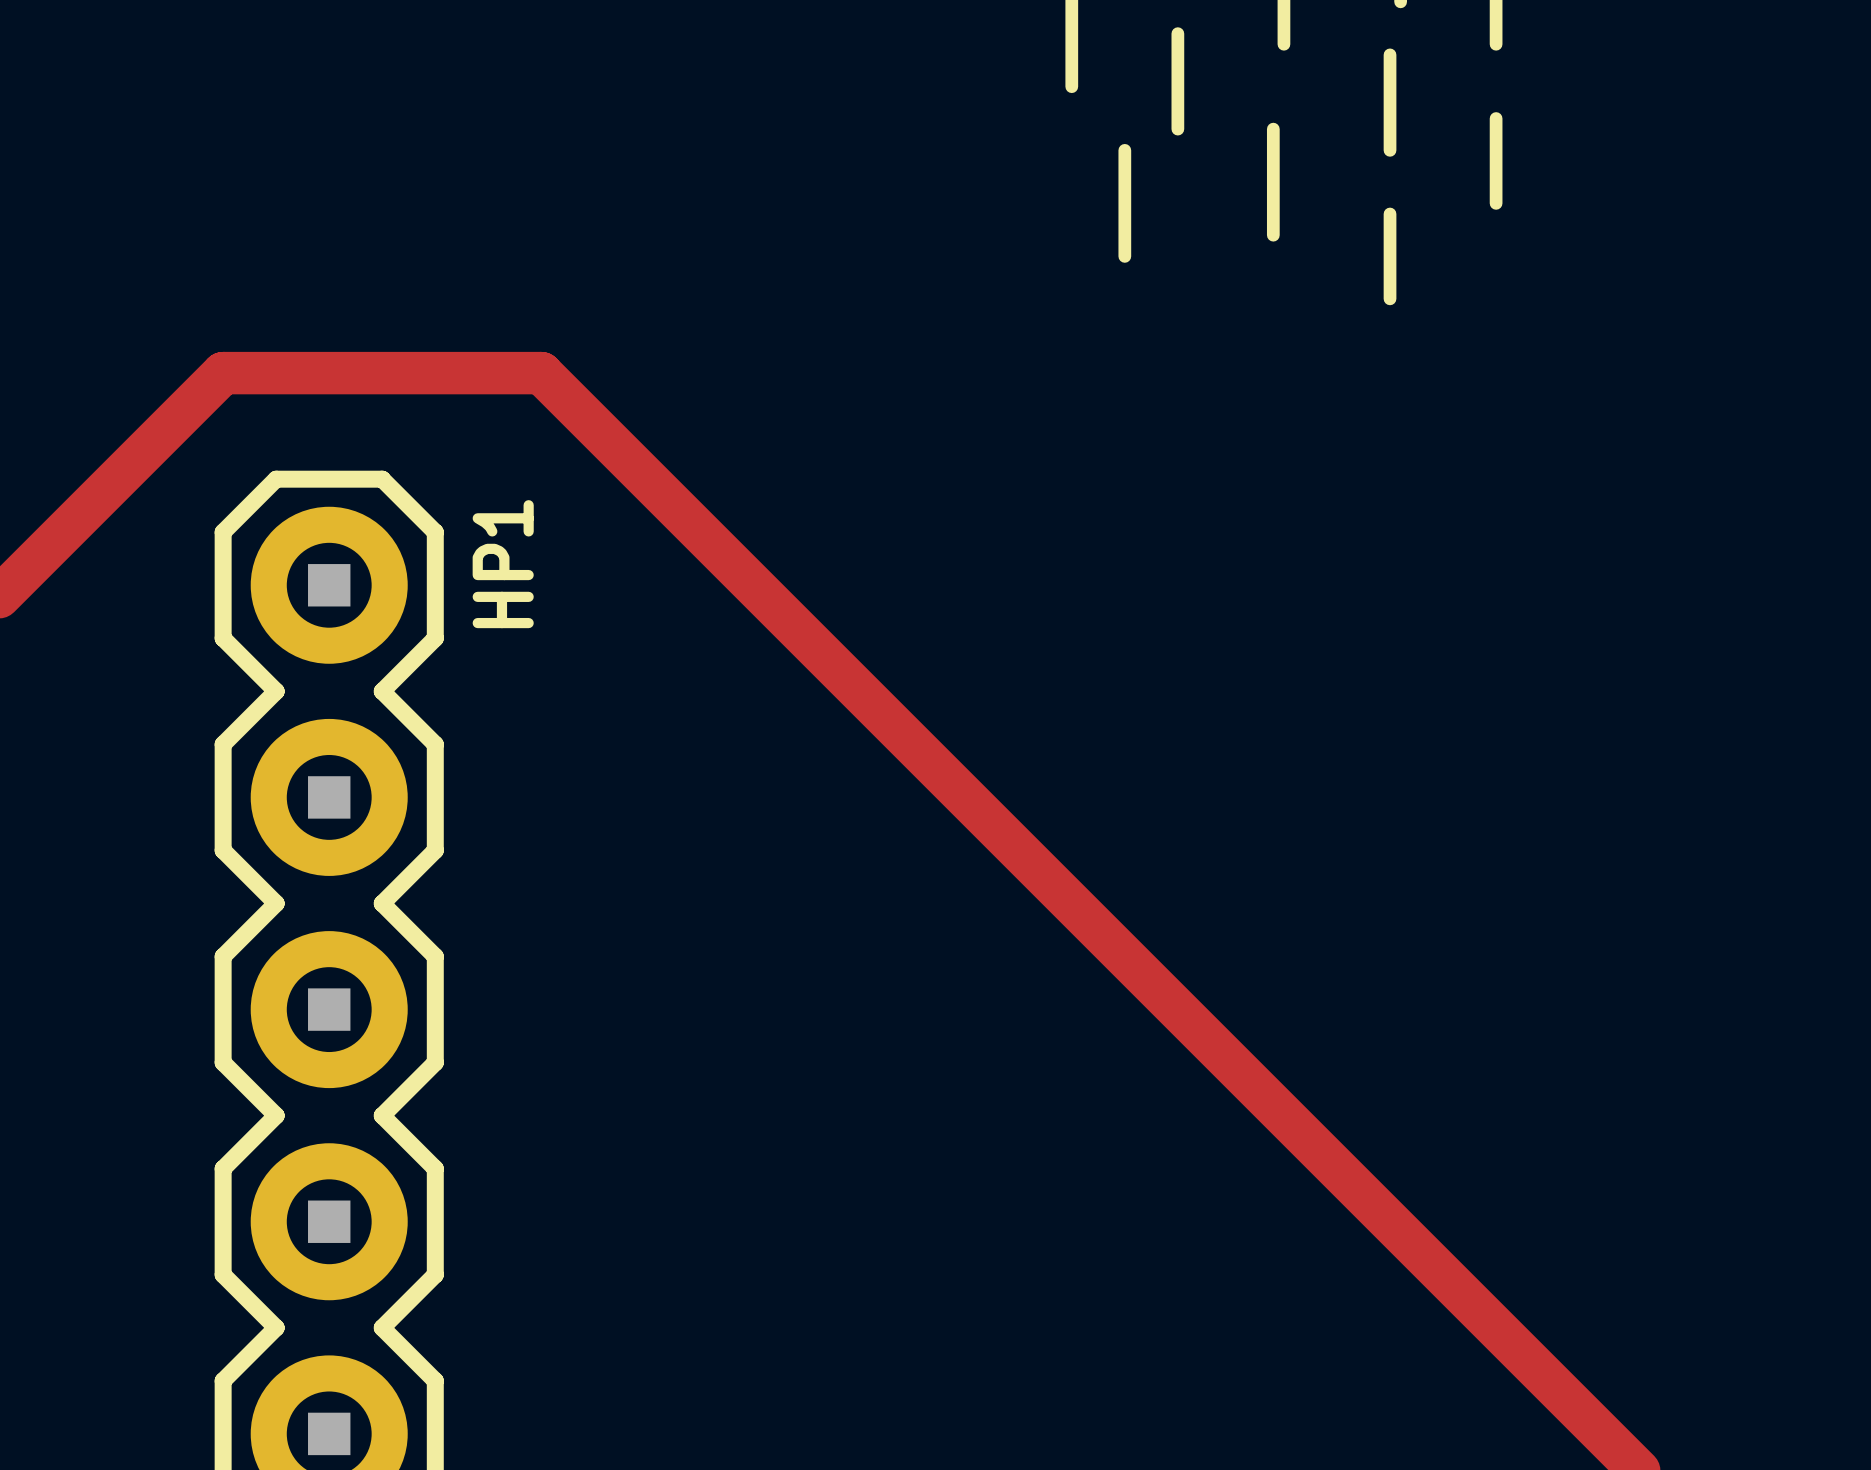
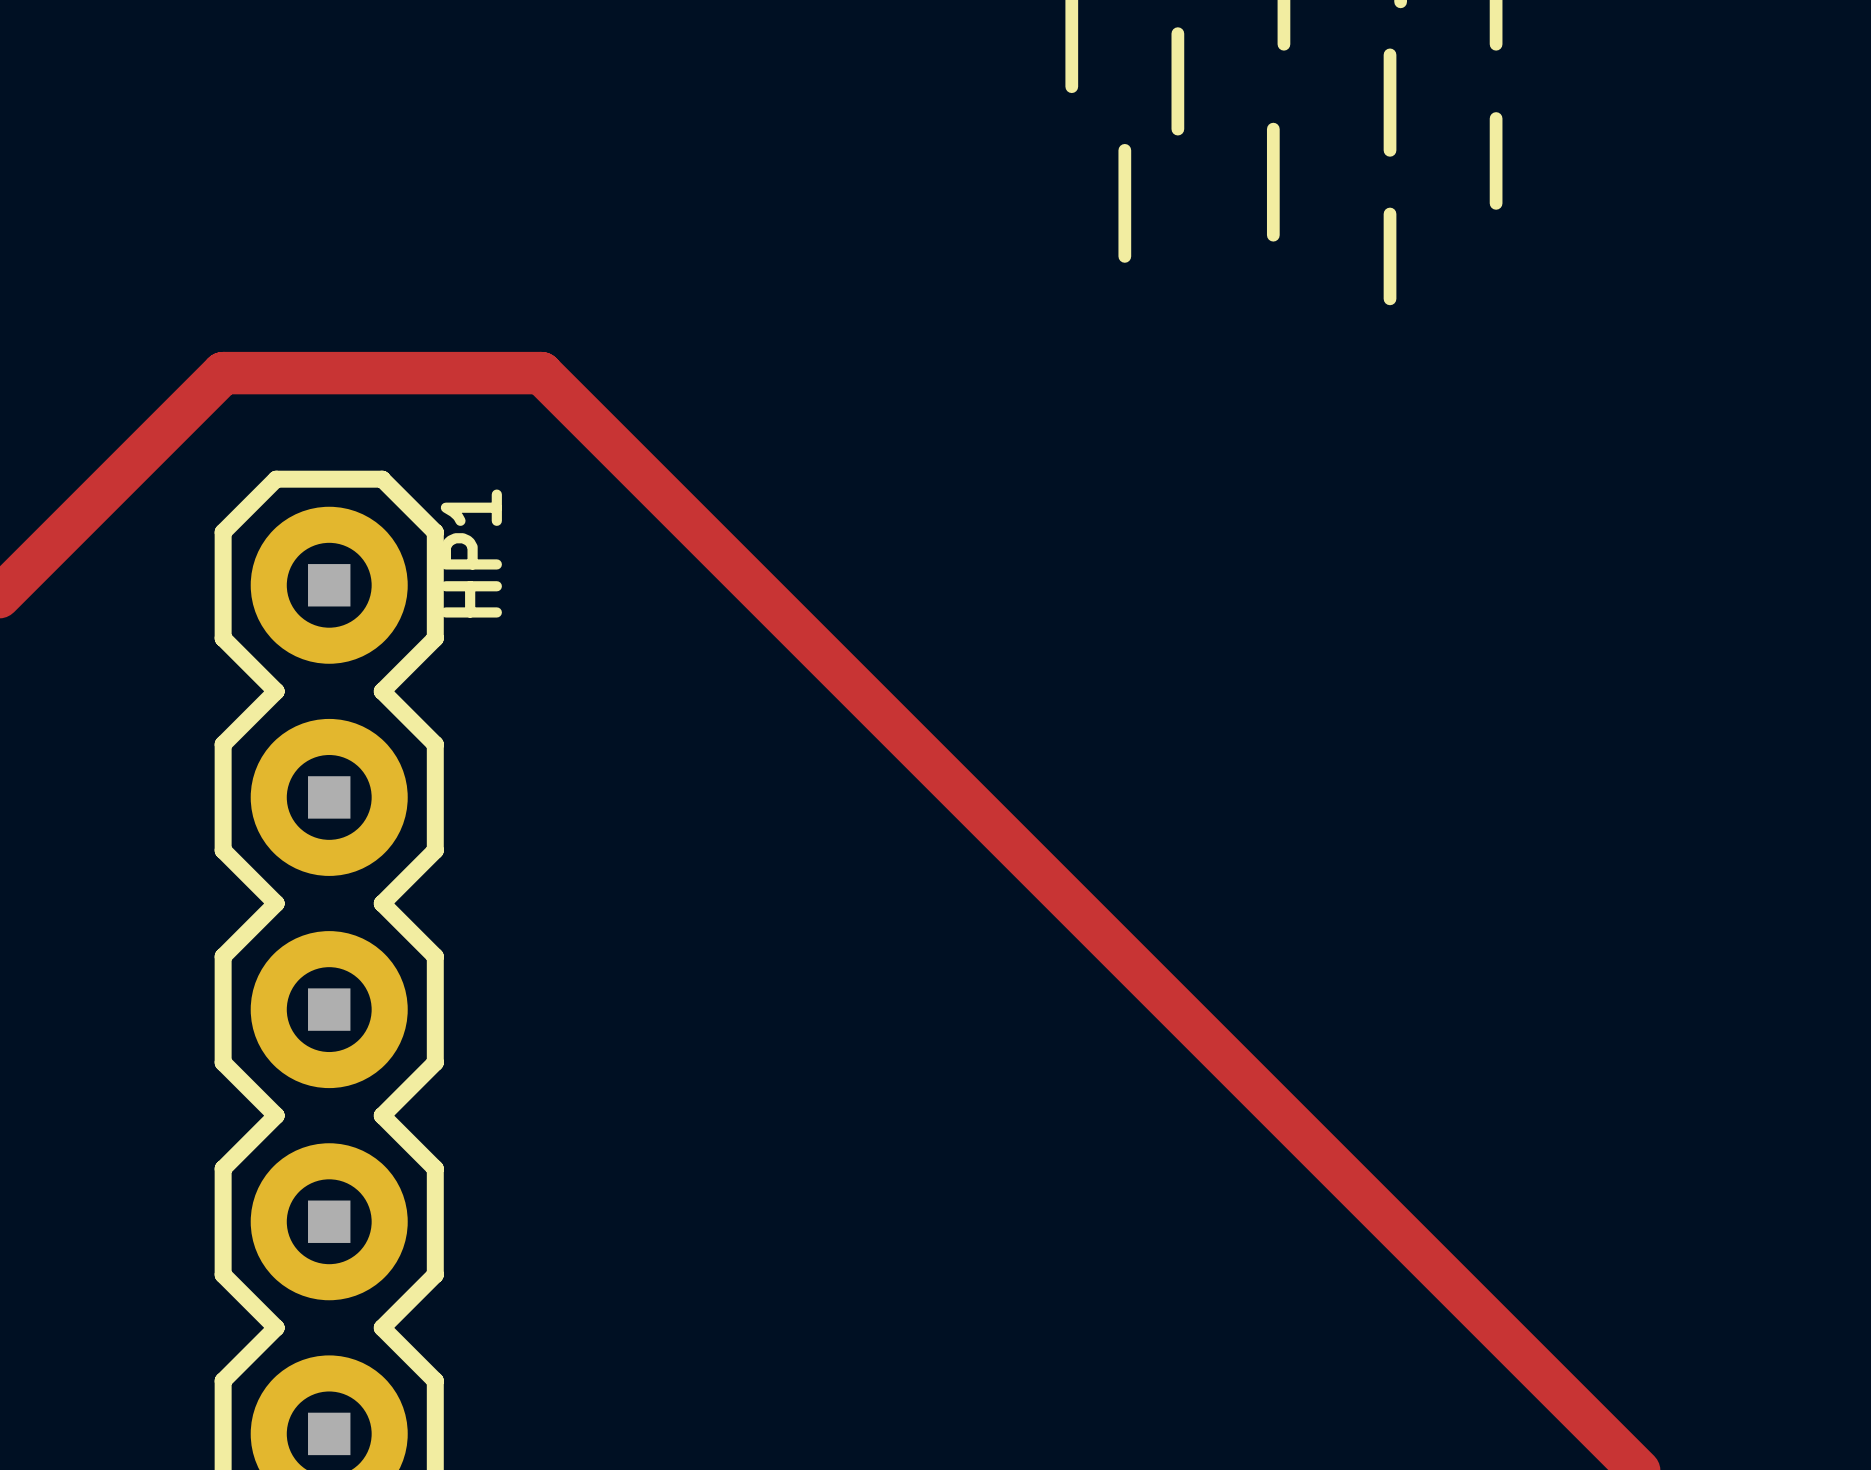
HP1 name position: HP1 (503, 564) -> HP1 (471, 553)

